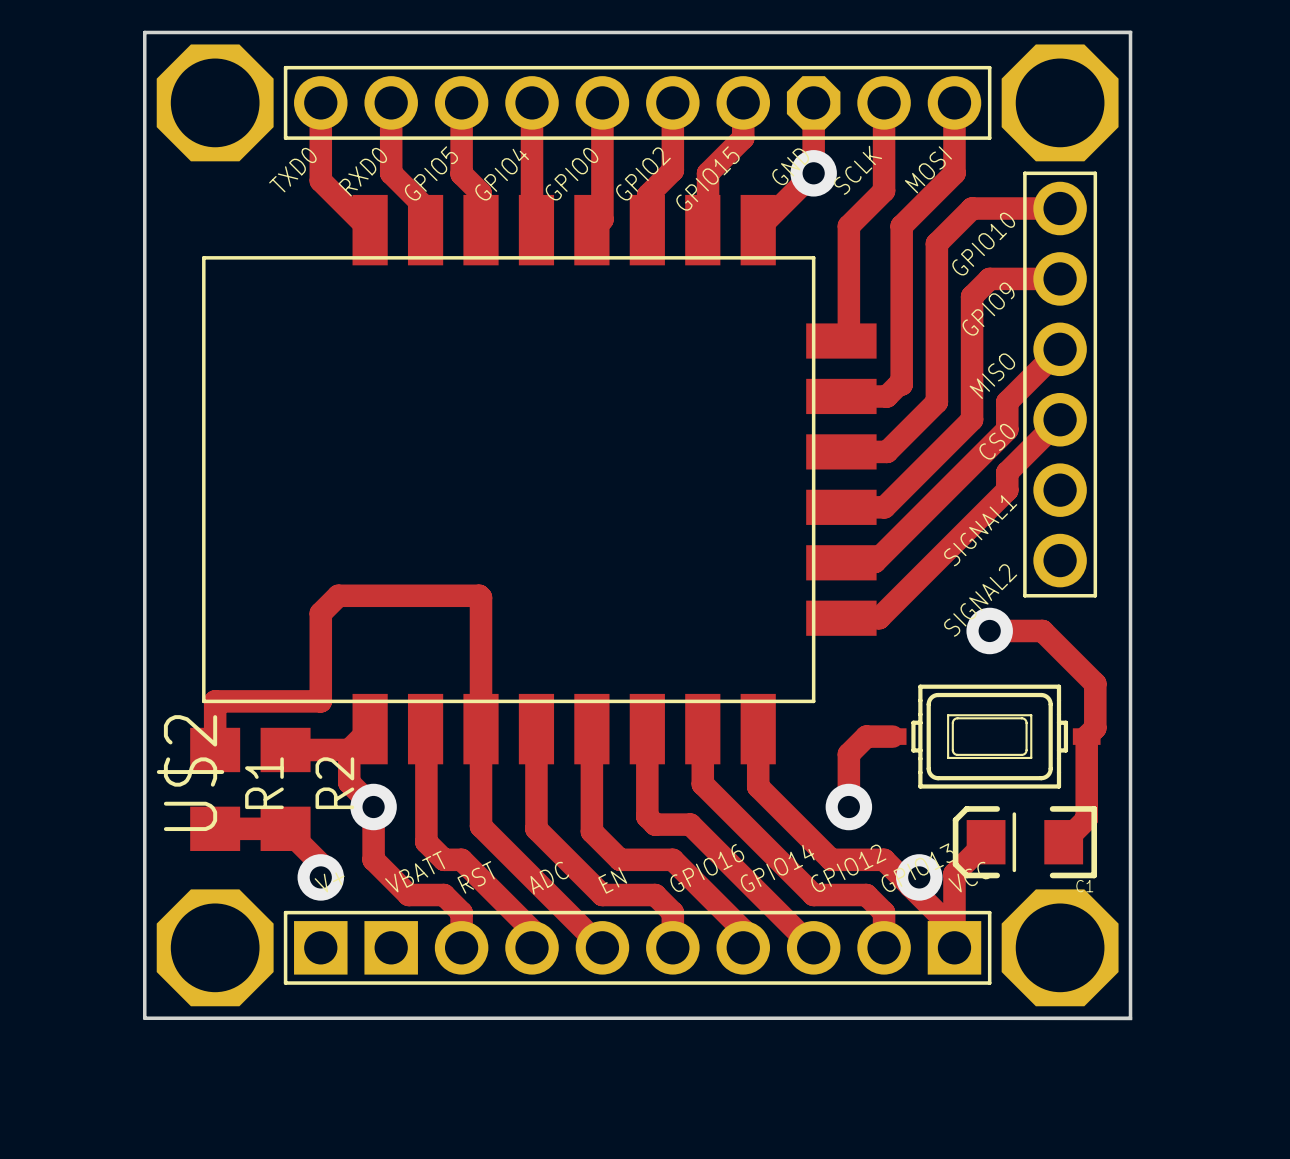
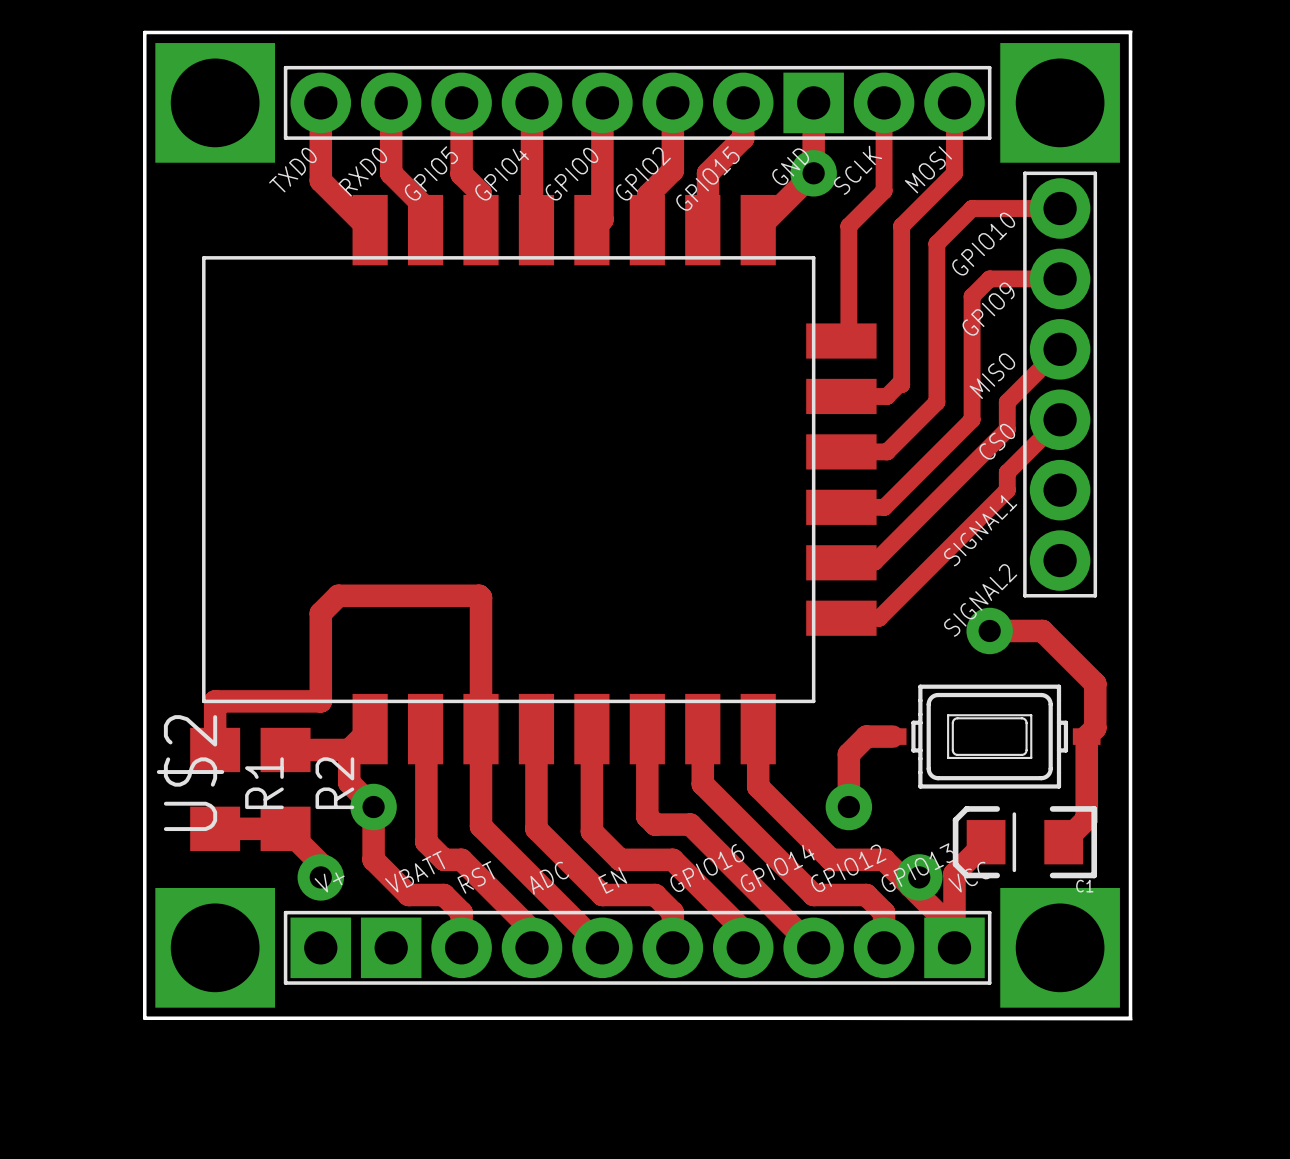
U$2 footprint: [142, 30, 1133, 1021] -> [142, 30, 1133, 1021]
track width: thick (884, 102) (884, 190) (848, 226) (848, 333) -> thin (884, 102) (884, 190) (848, 226) (848, 333)
track width: thick (954, 102) (954, 173) (901, 226) (901, 384) (898, 384) (886, 396) (841, 396) -> thin (954, 102) (954, 173) (901, 226) (901, 384) (898, 384) (886, 396) (841, 396)
track width: thick (1060, 208) (972, 208) (936, 243) (936, 402) (887, 451) (841, 451) -> thin (1060, 208) (972, 208) (936, 243) (936, 402) (887, 451) (841, 451)
track width: thick (1060, 278) (989, 278) (972, 296) (972, 419) (884, 507) (841, 507) -> thin (1060, 278) (989, 278) (972, 296) (972, 419) (884, 507) (841, 507)
track width: thick (1060, 349) (1007, 402) (1007, 429) (874, 561) (842, 561) -> thin (1060, 349) (1007, 402) (1007, 429) (874, 561) (842, 561)
track width: thick (1060, 419) (1007, 472) (1007, 490) (879, 618) (841, 618) -> thin (1060, 419) (1007, 472) (1007, 490) (879, 618) (841, 618)

